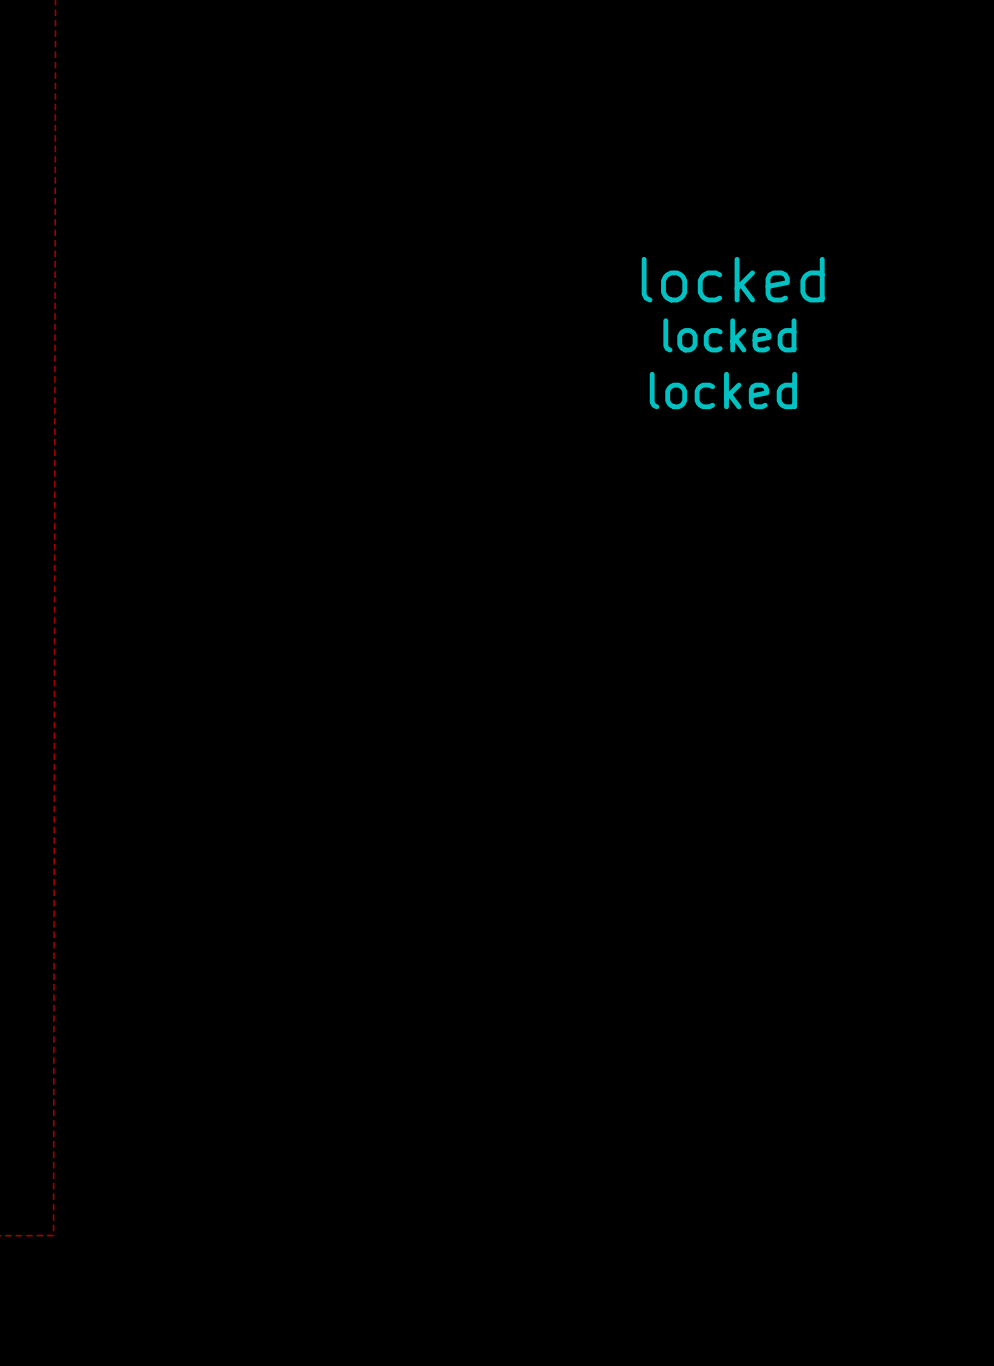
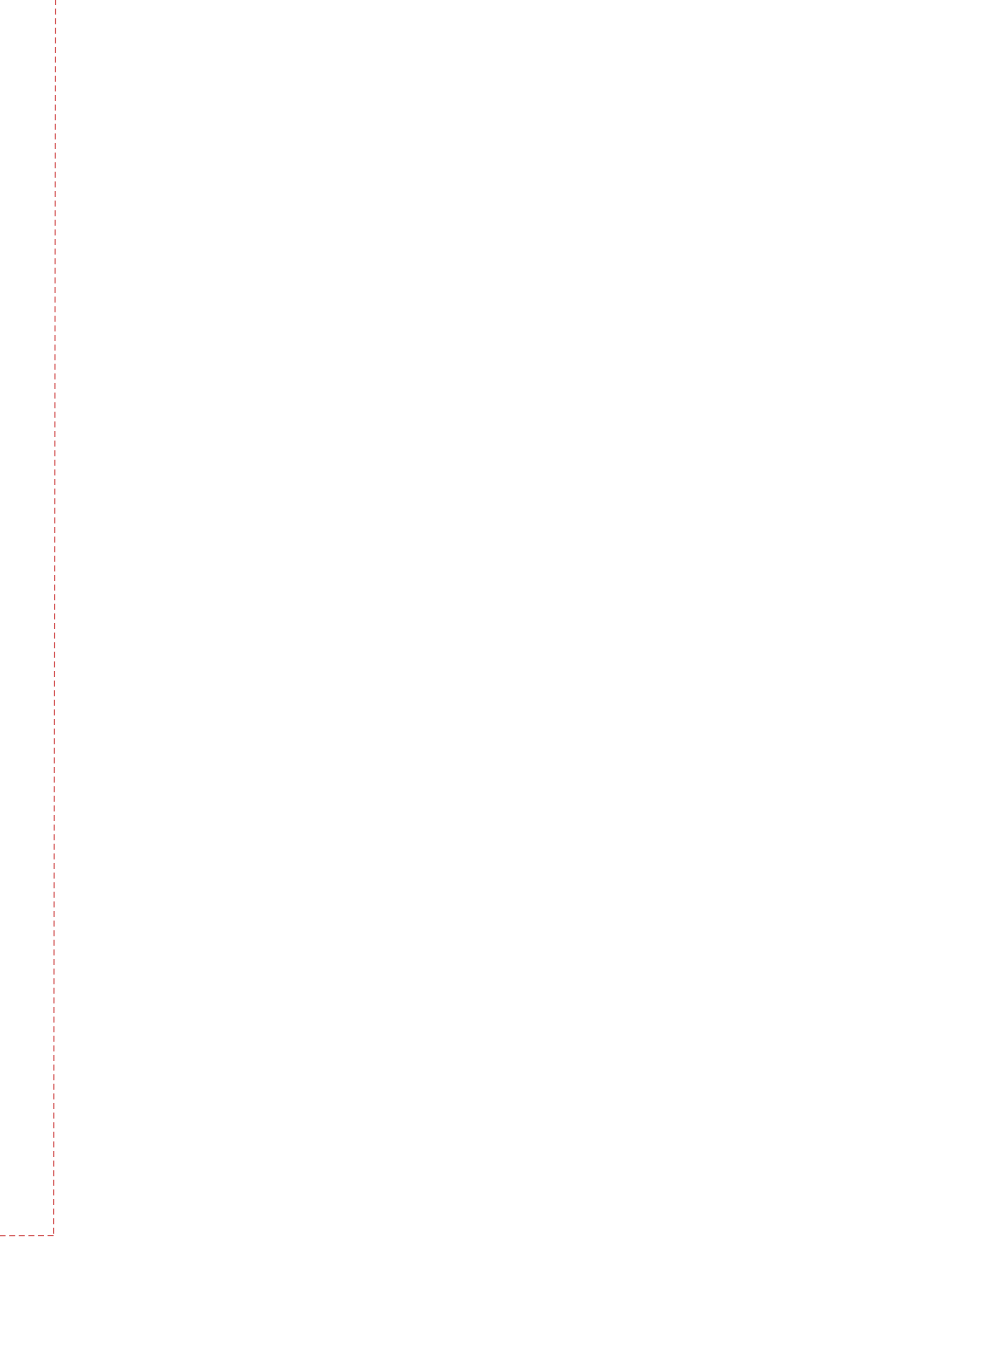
text: locked (733, 279) -> none
text: locked (729, 335) -> none
text: locked (723, 390) -> none

